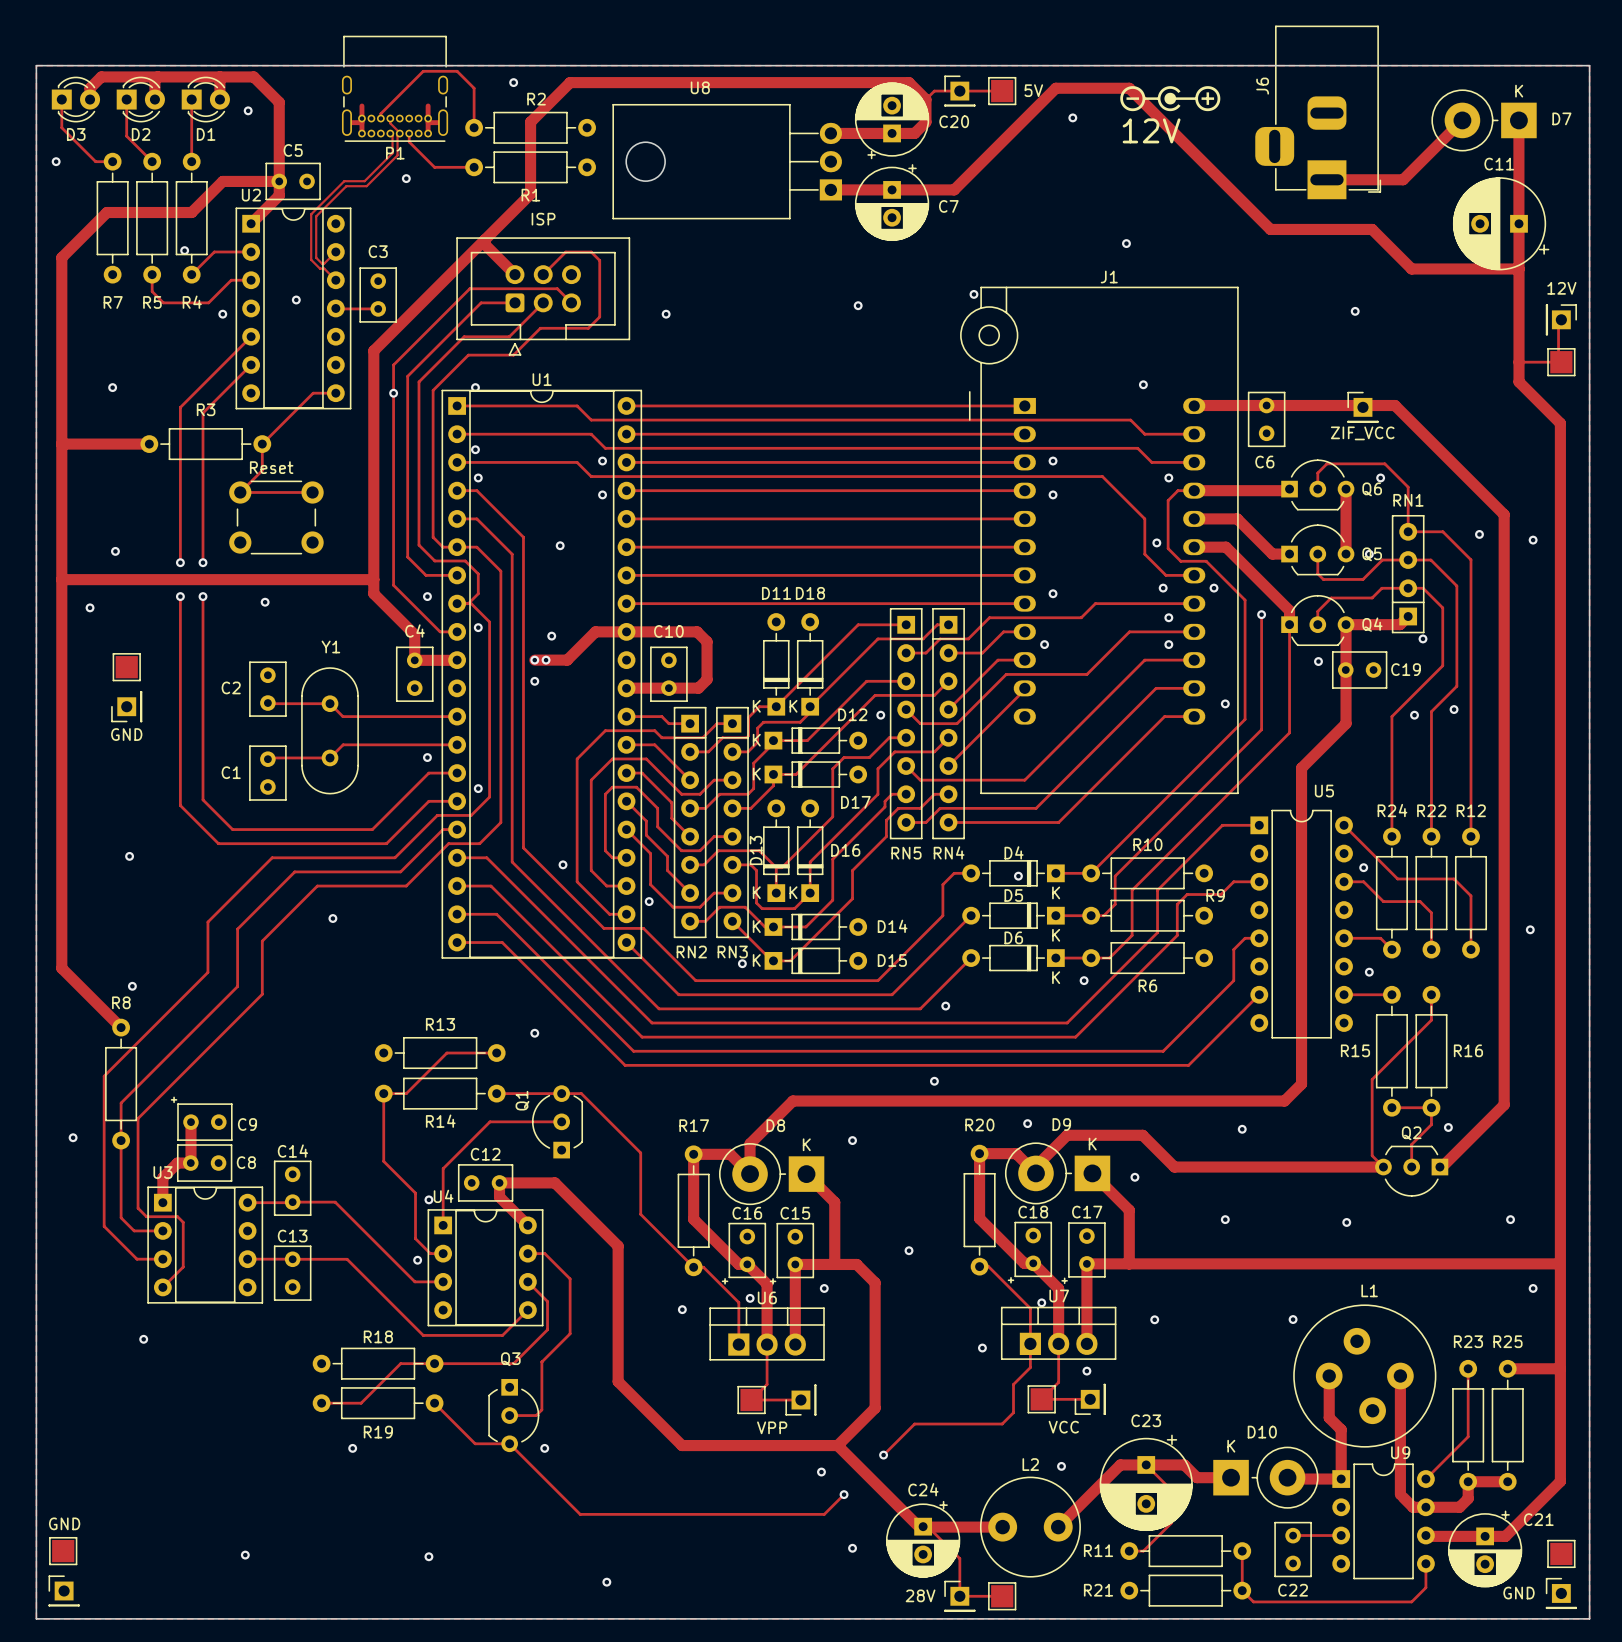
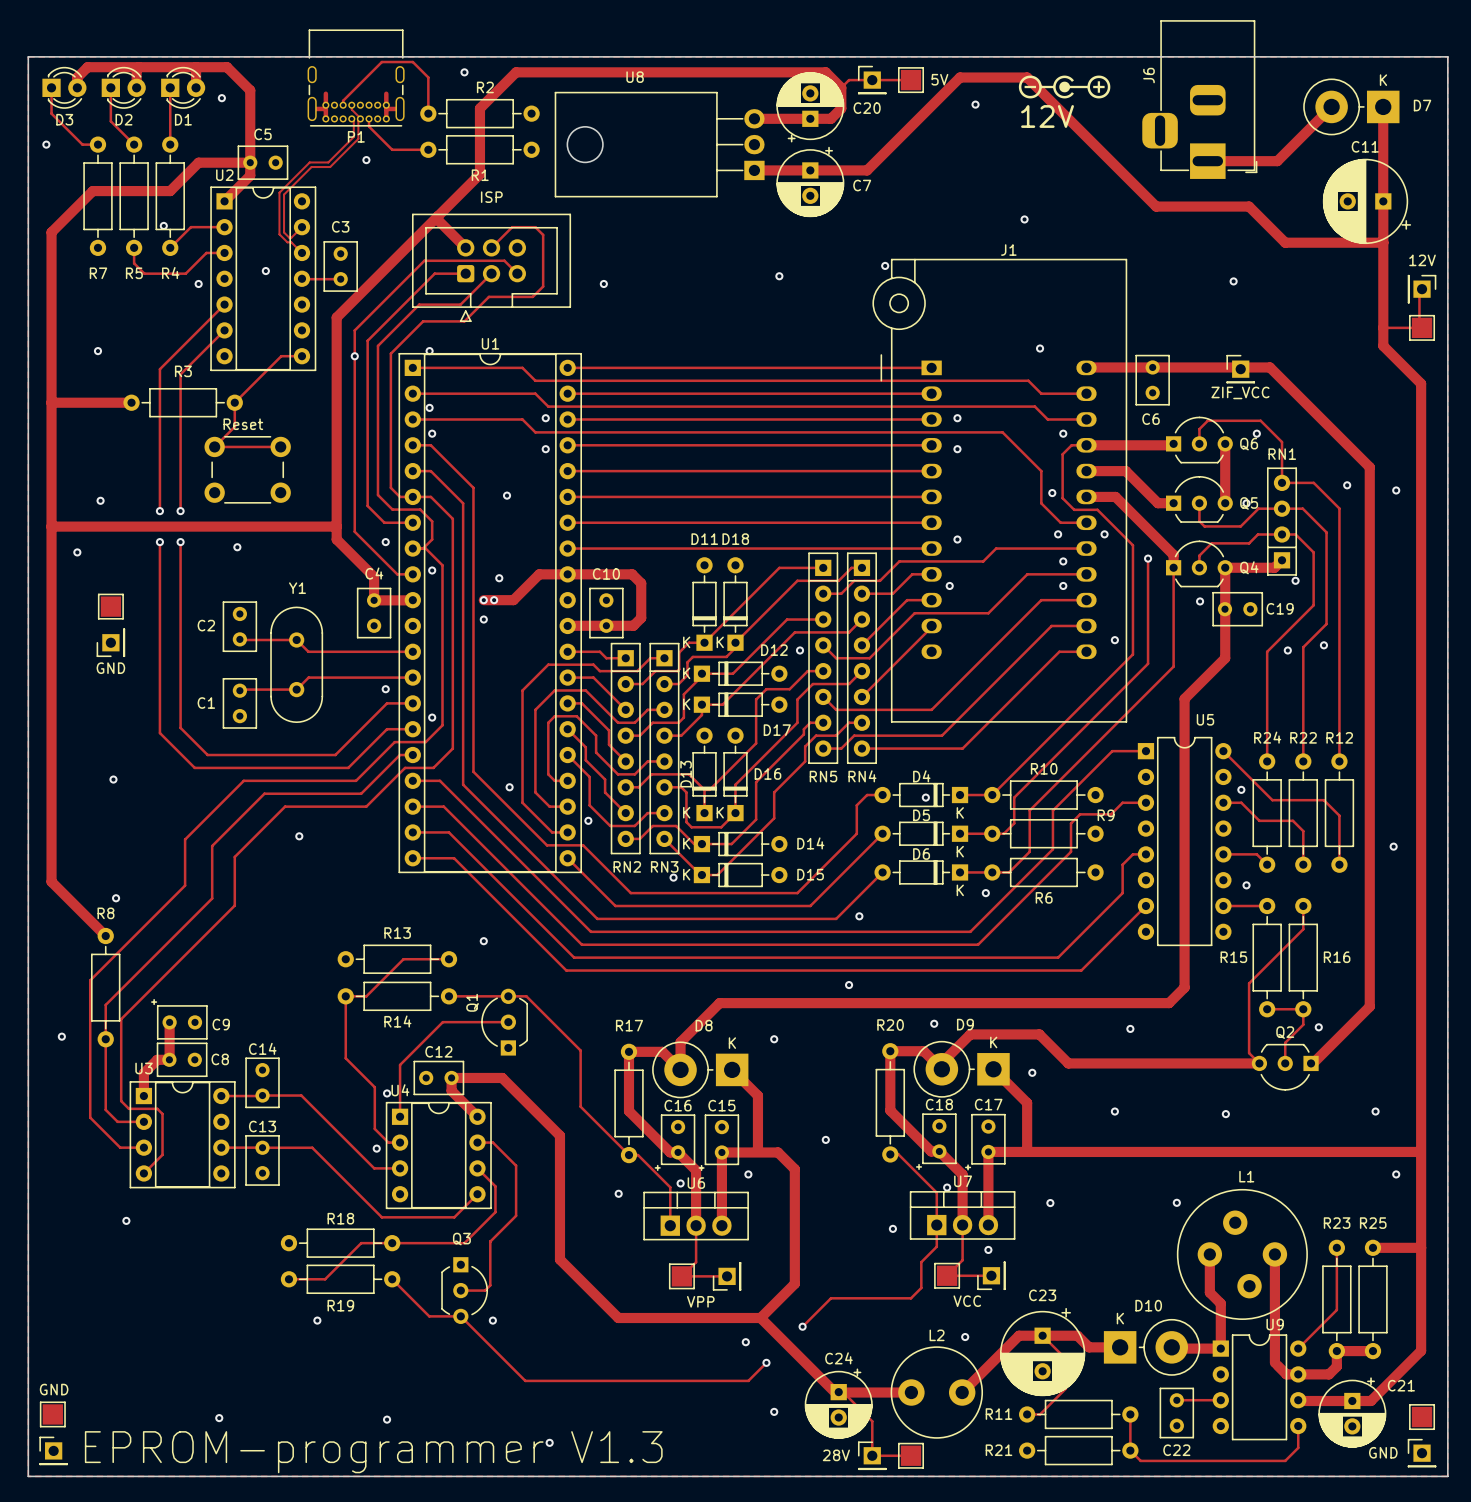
text: none -> EPROM-programmer V1.3 (373, 1452)

